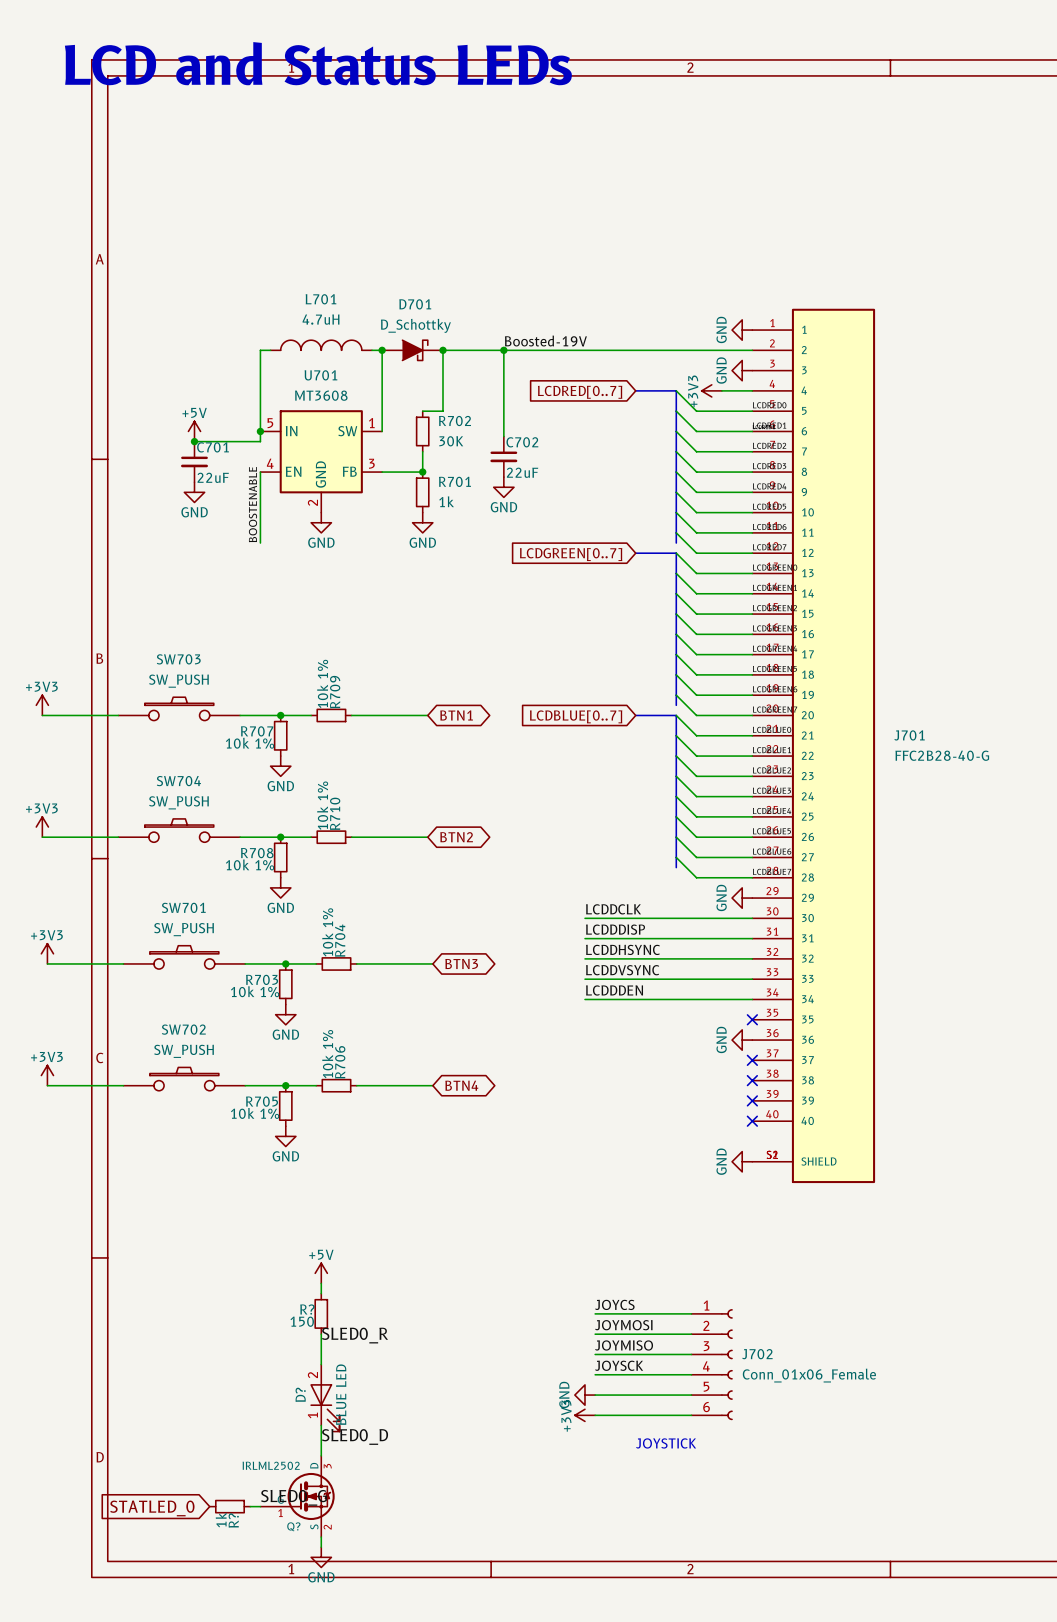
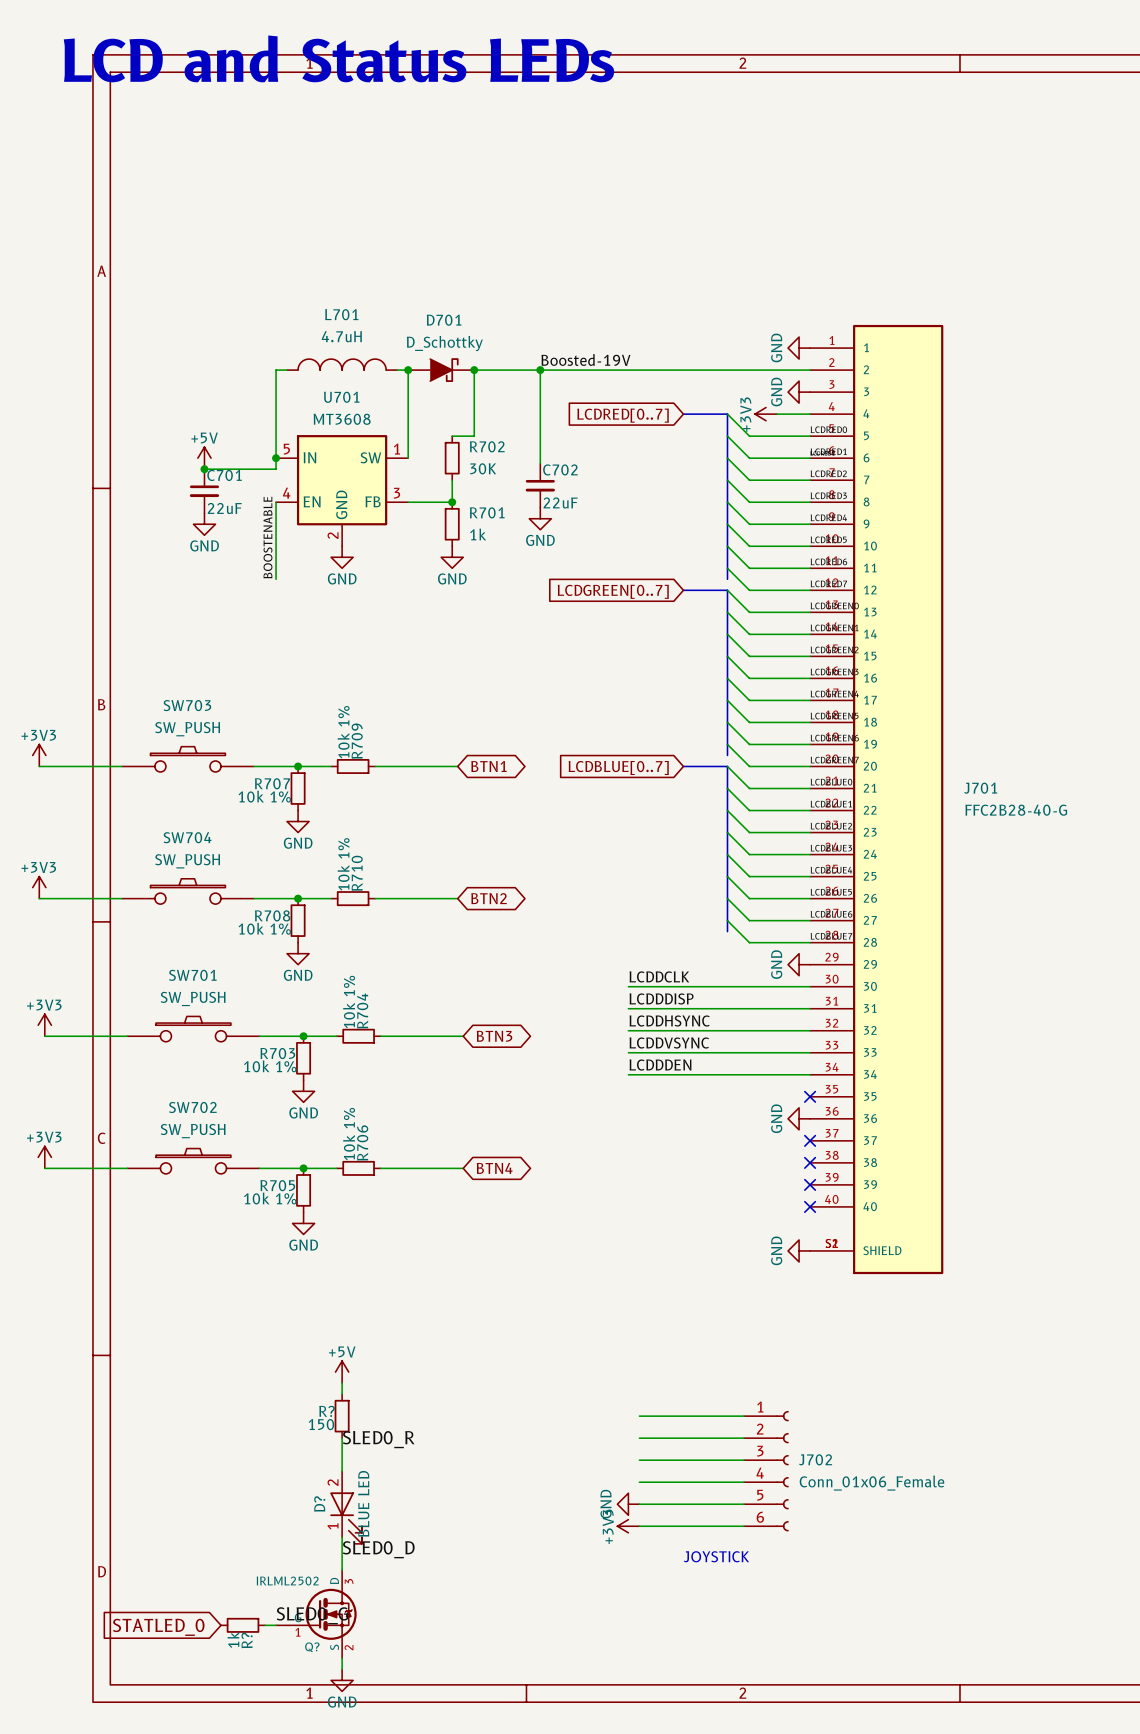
label: JOYCS (614, 1304) -> none
label: JOYMOSI (623, 1325) -> none
label: JOYMISO (624, 1345) -> none
label: JOYSCK (619, 1365) -> none

